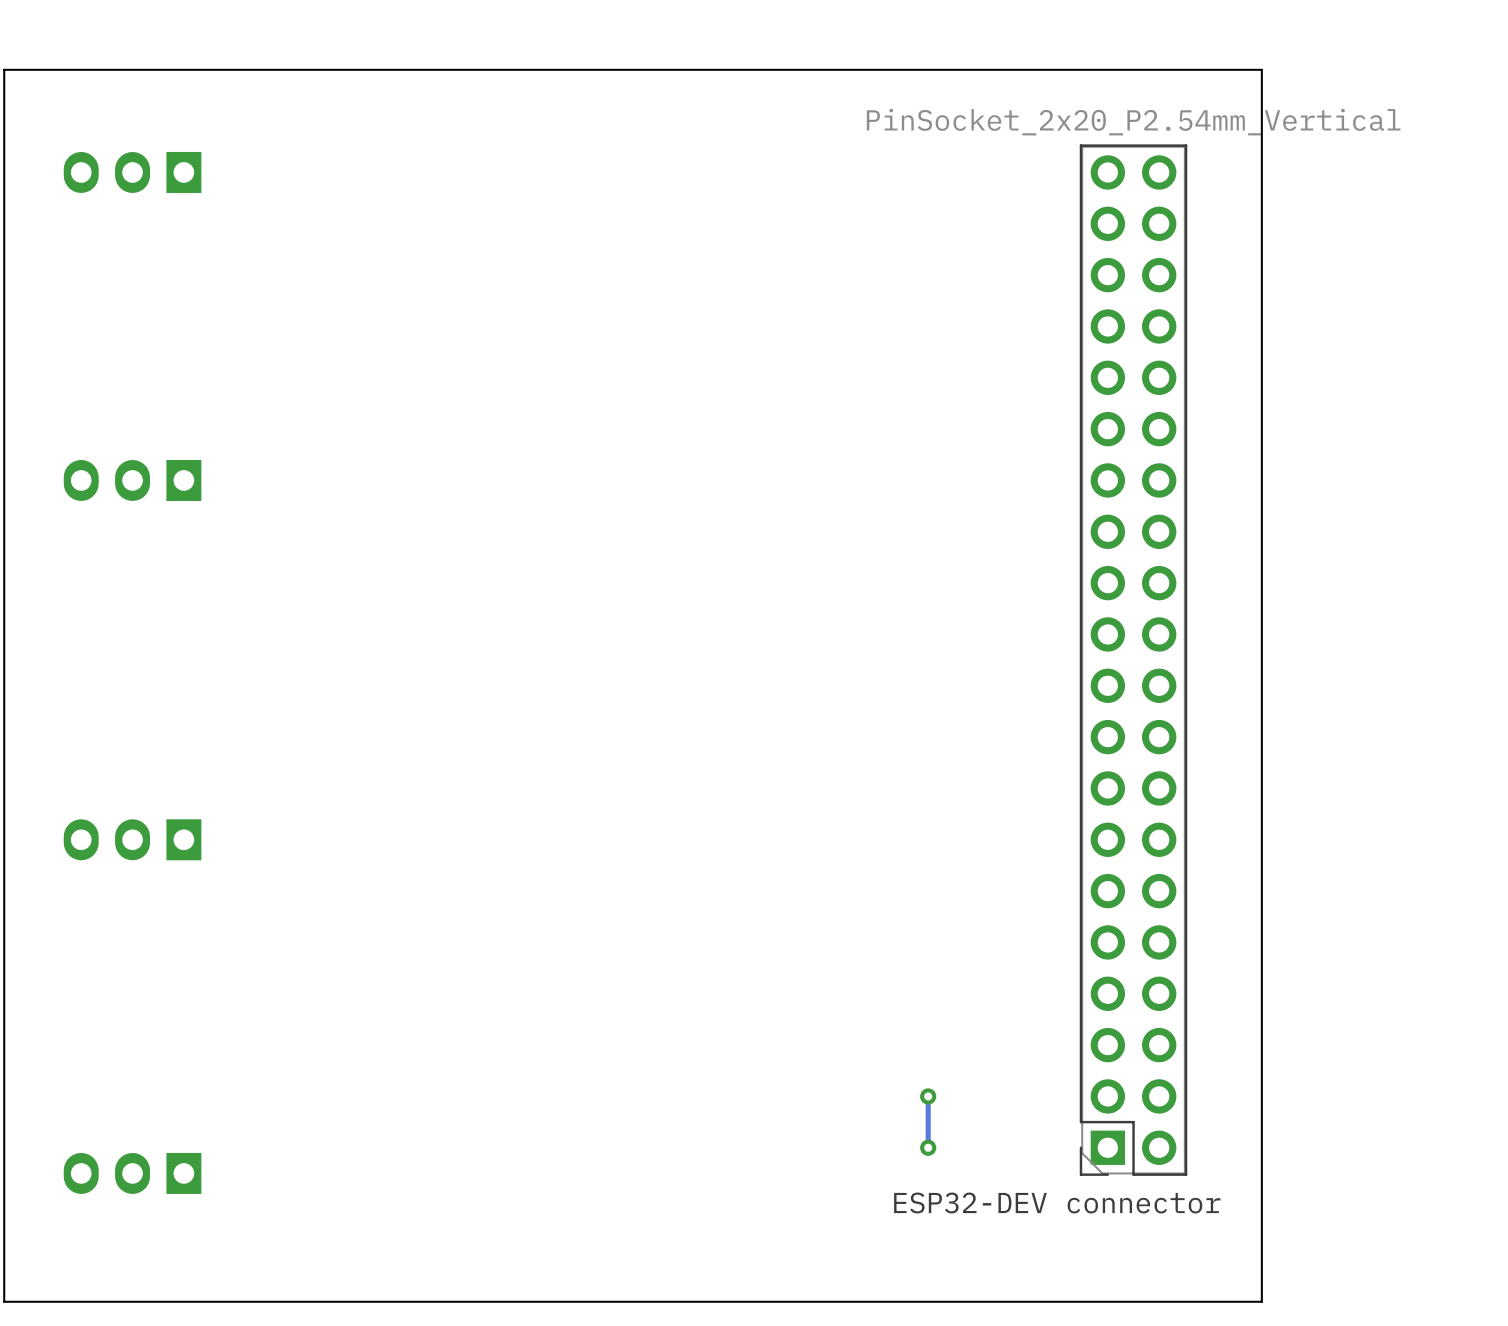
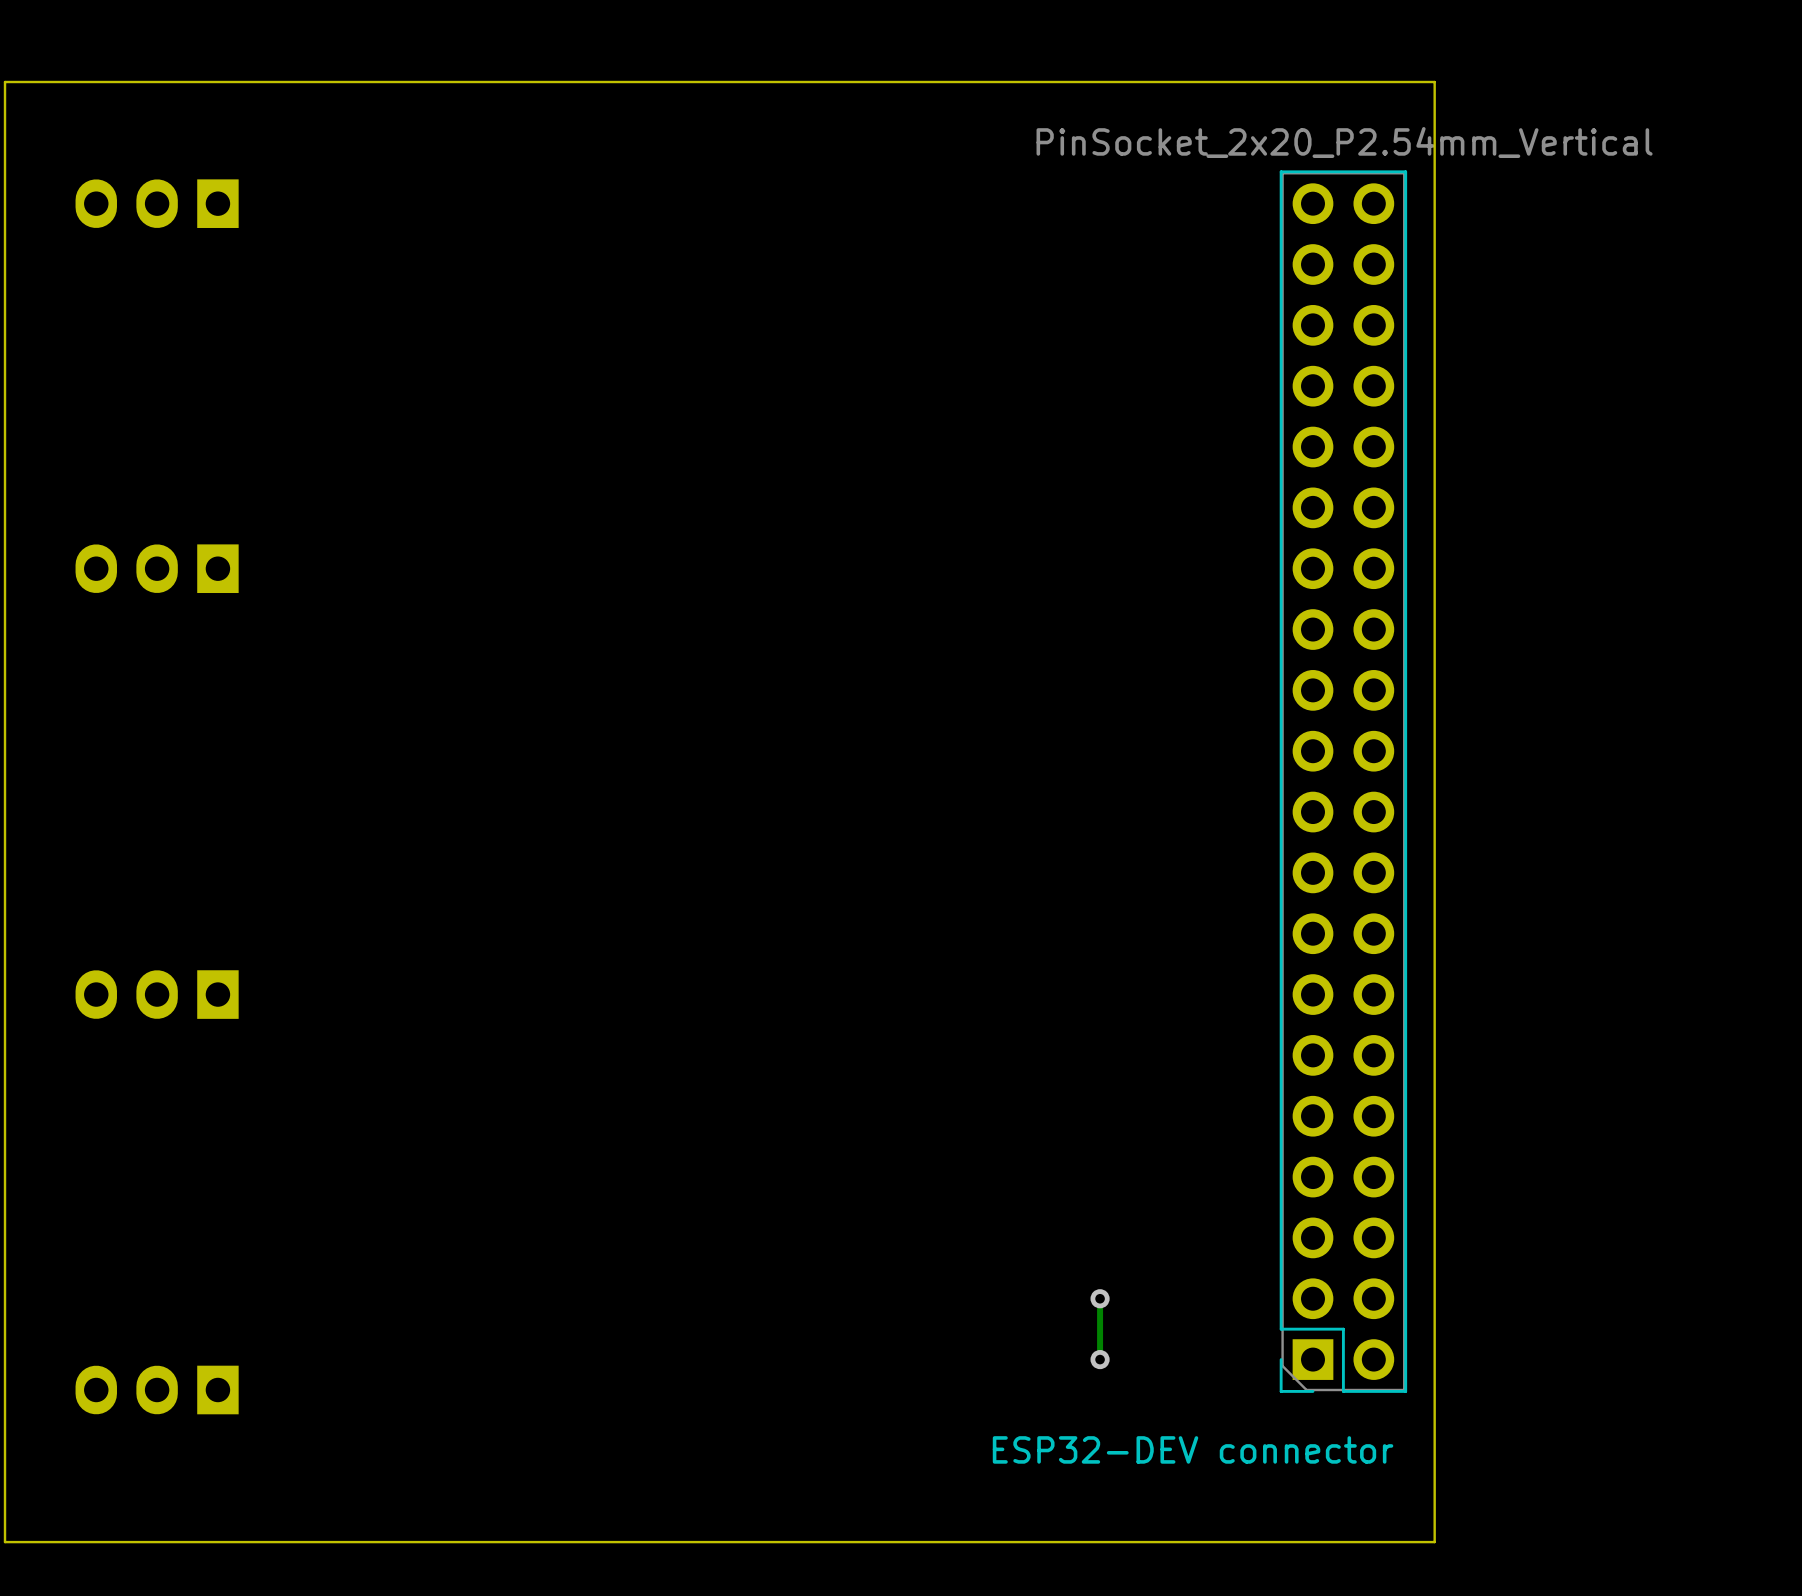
board edge: (1210, 69) (1261, 69) (1261, 1301) (1210, 1301) -> (1434, 82) (1434, 1542)
ESP32-DEV connector name position: ESP32-DEV connector (1057, 1203) -> ESP32-DEV connector (1193, 1449)

